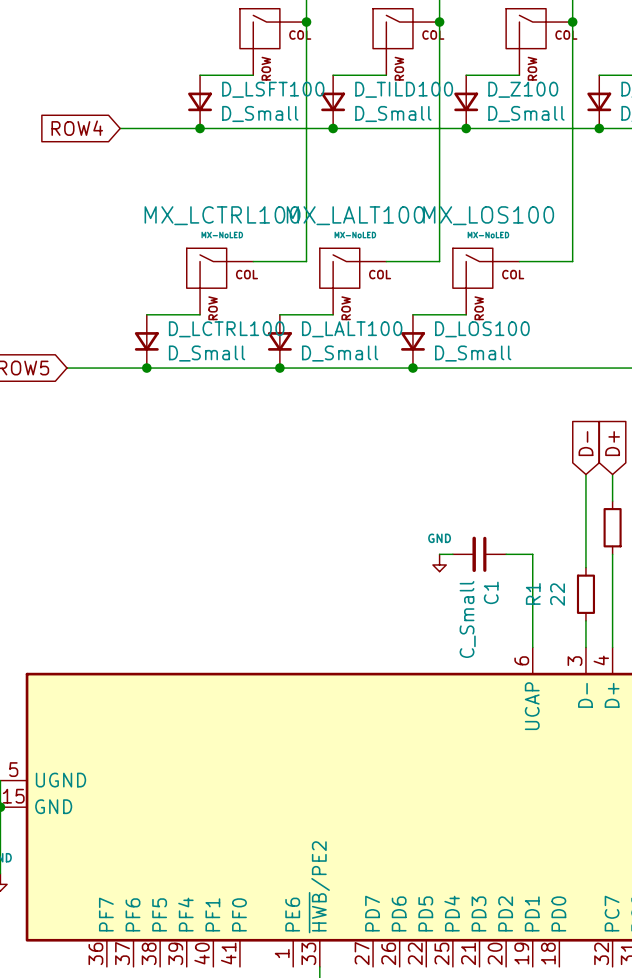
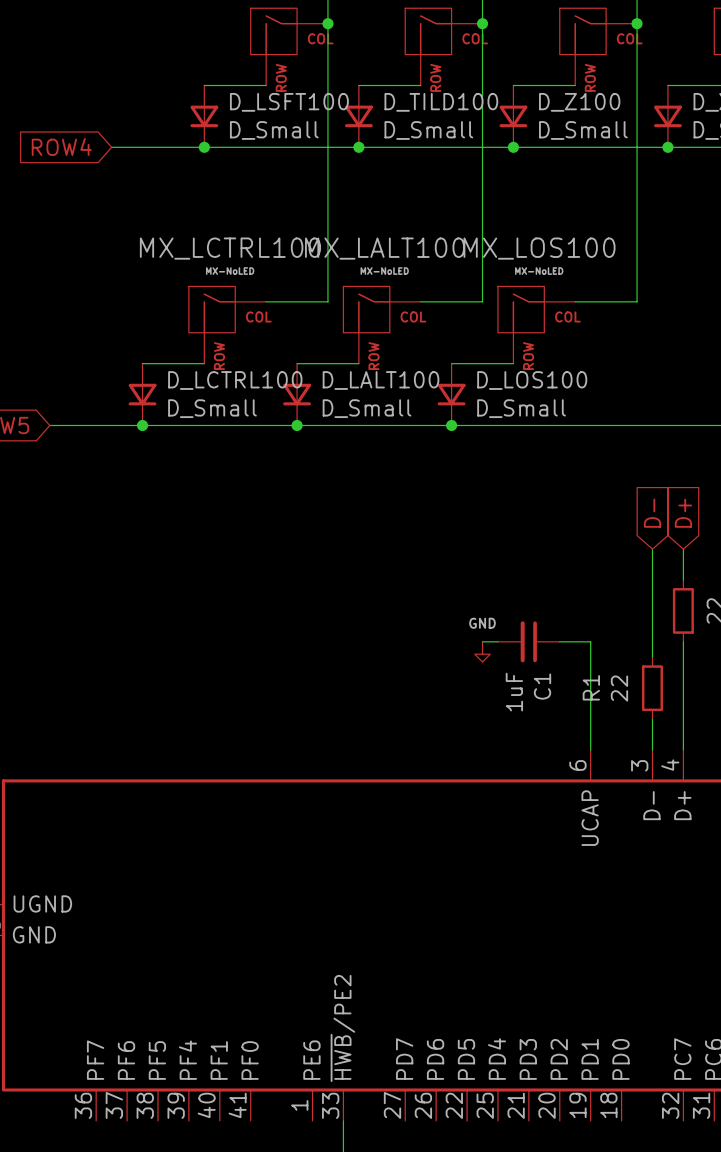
C1 value: C_Small (467, 619) -> 1uF (514, 692)

